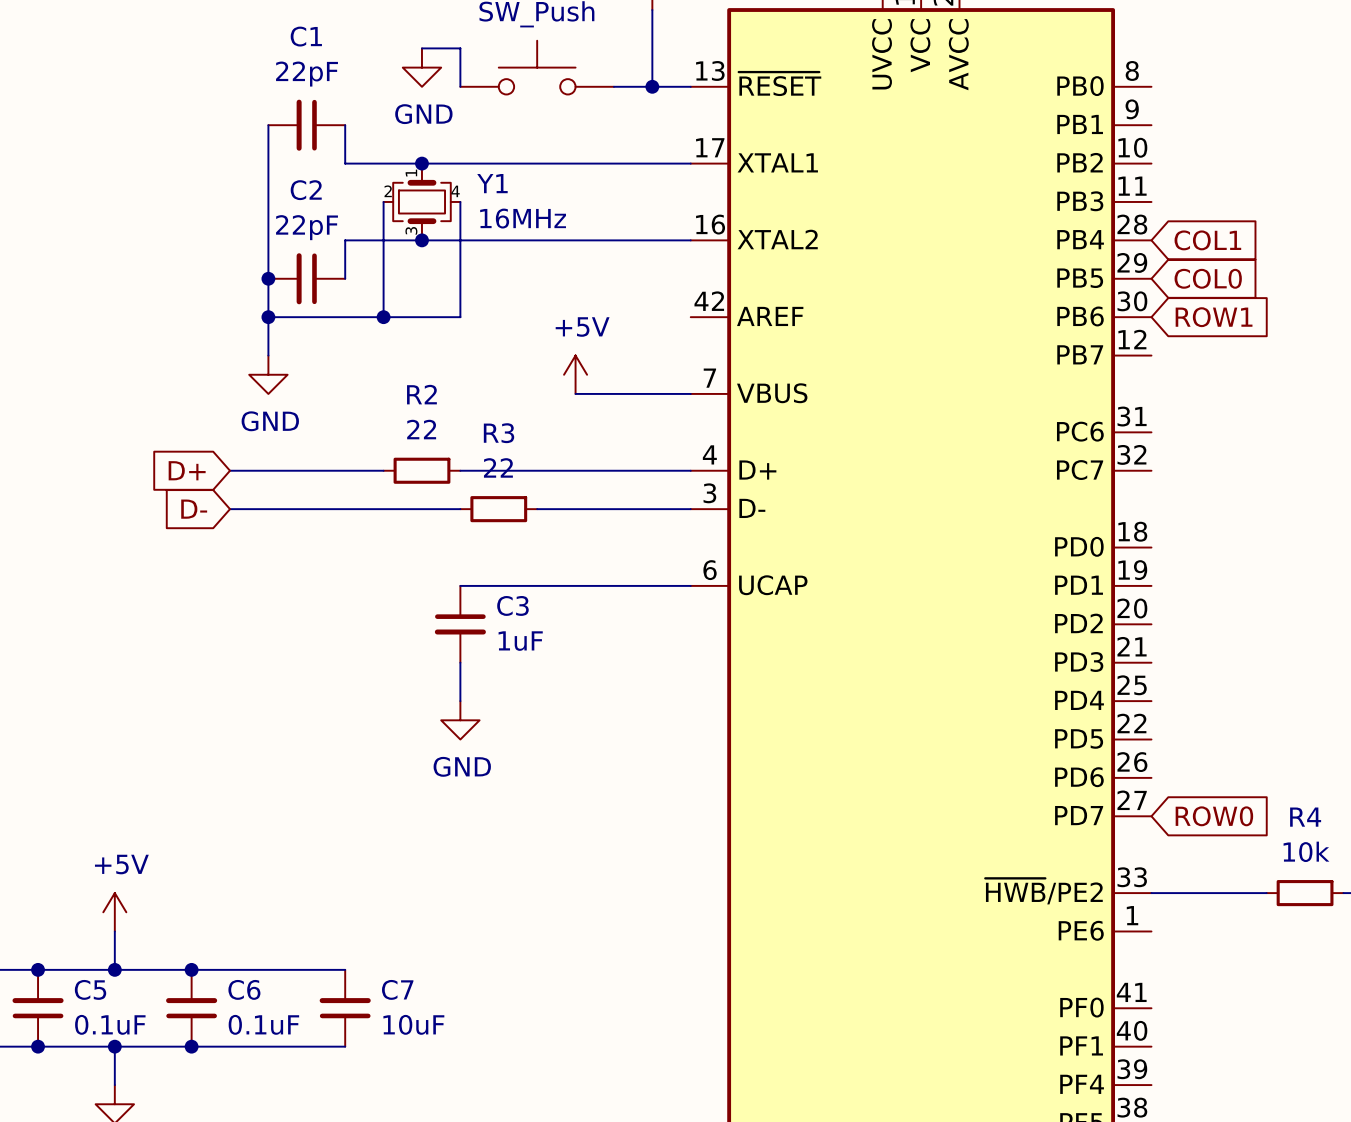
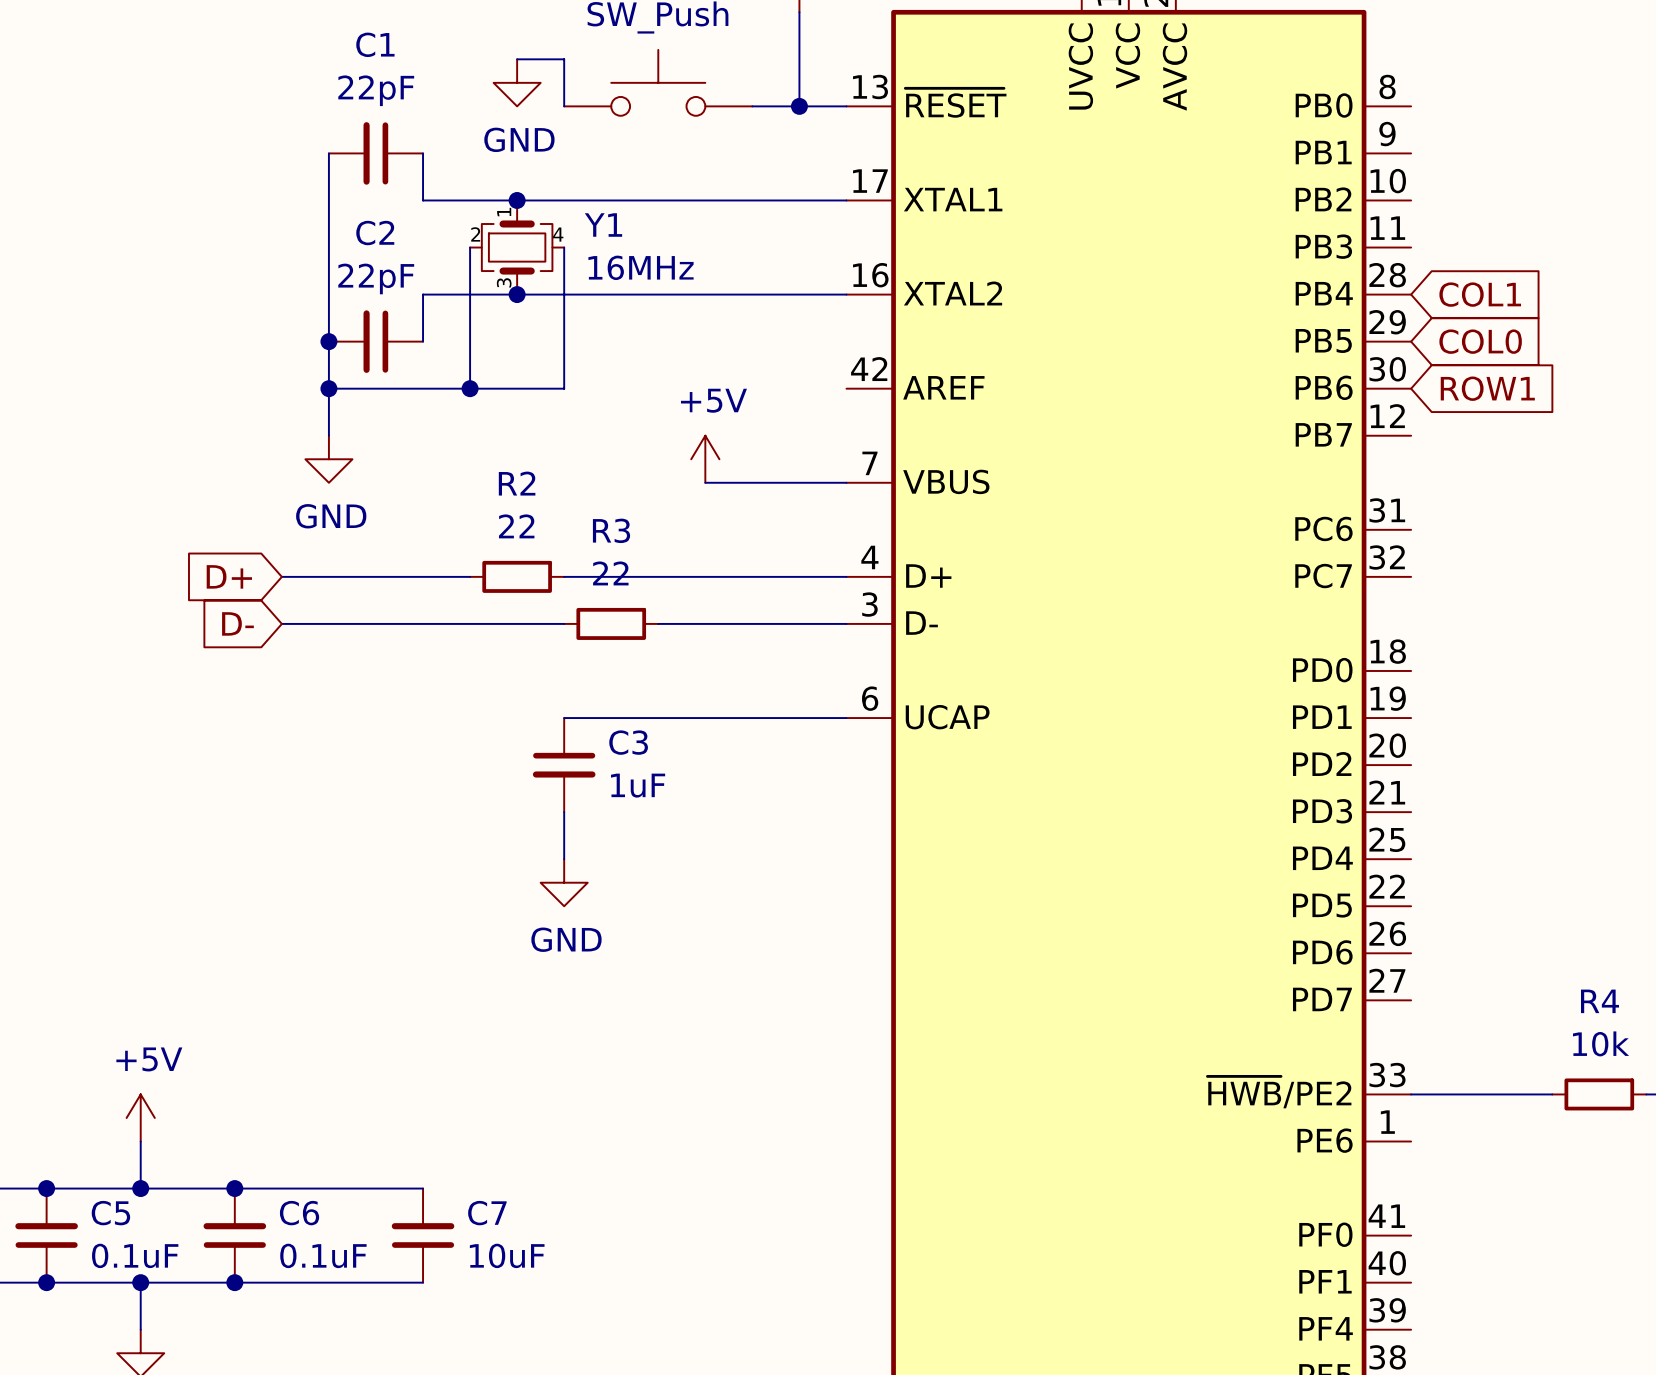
global label: ROW0 (1214, 816) -> none

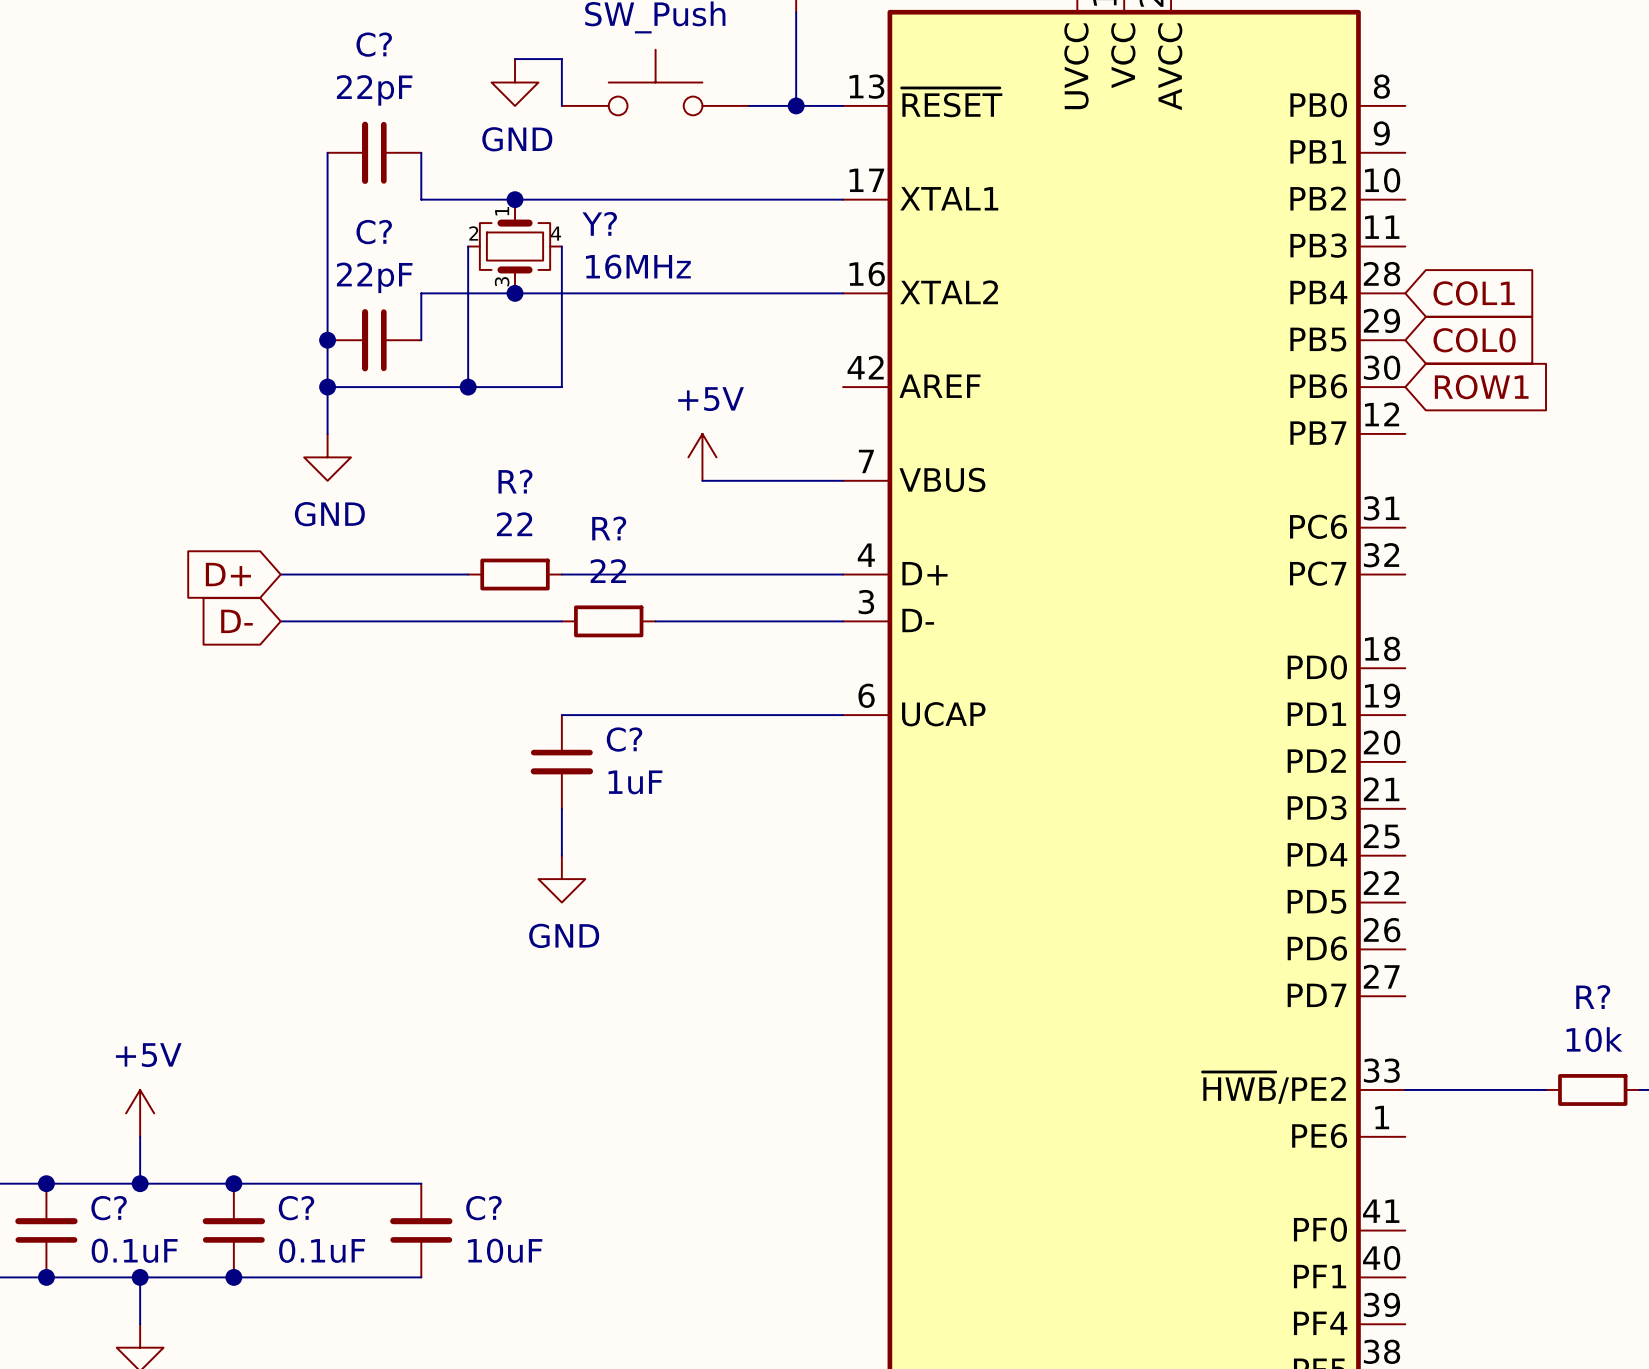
C1 name: C1 (375, 44) -> C? (374, 44)
Y1 name: Y1 (603, 225) -> Y? (599, 223)
C2 name: C2 (375, 233) -> C? (374, 232)
R2 name: R2 (517, 483) -> R? (515, 481)
R3 name: R3 (611, 530) -> R? (609, 528)
C3 name: C3 (628, 742) -> C? (624, 739)
R4 name: R4 (1599, 1001) -> R? (1593, 997)
C5 name: C5 (110, 1213) -> C? (109, 1208)
C6 name: C6 (299, 1213) -> C? (296, 1208)
C7 name: C7 (487, 1213) -> C? (483, 1208)

